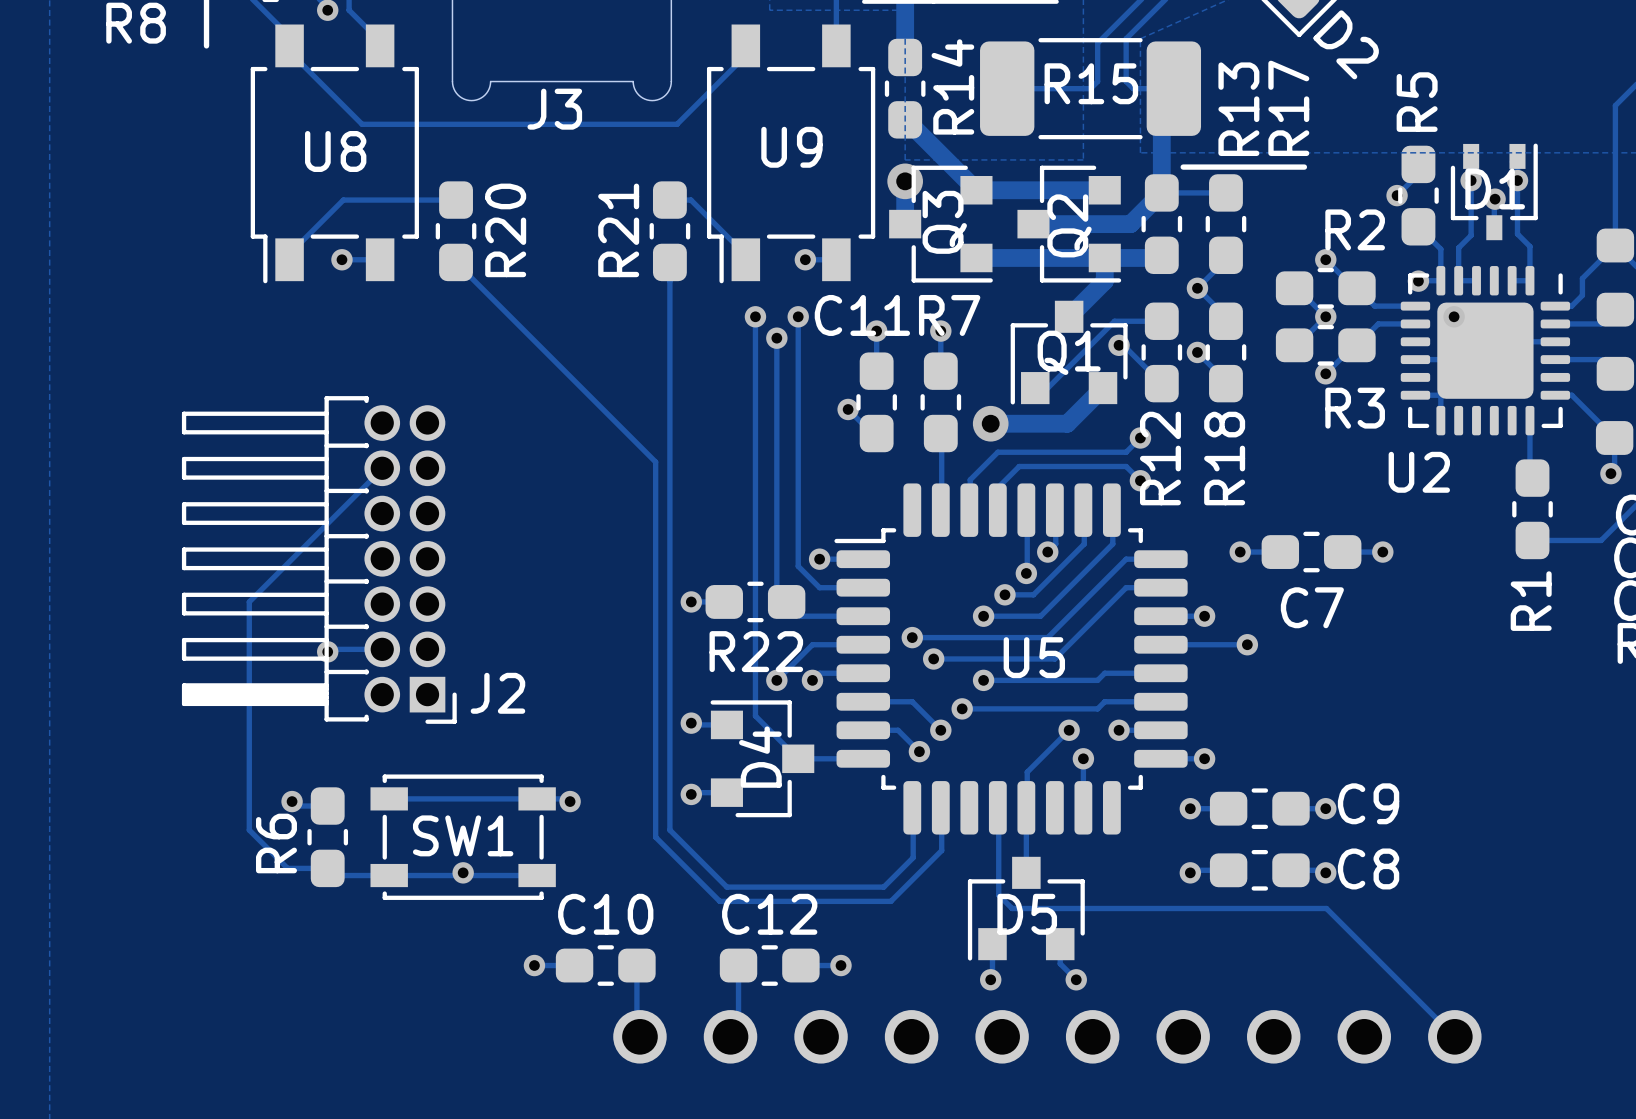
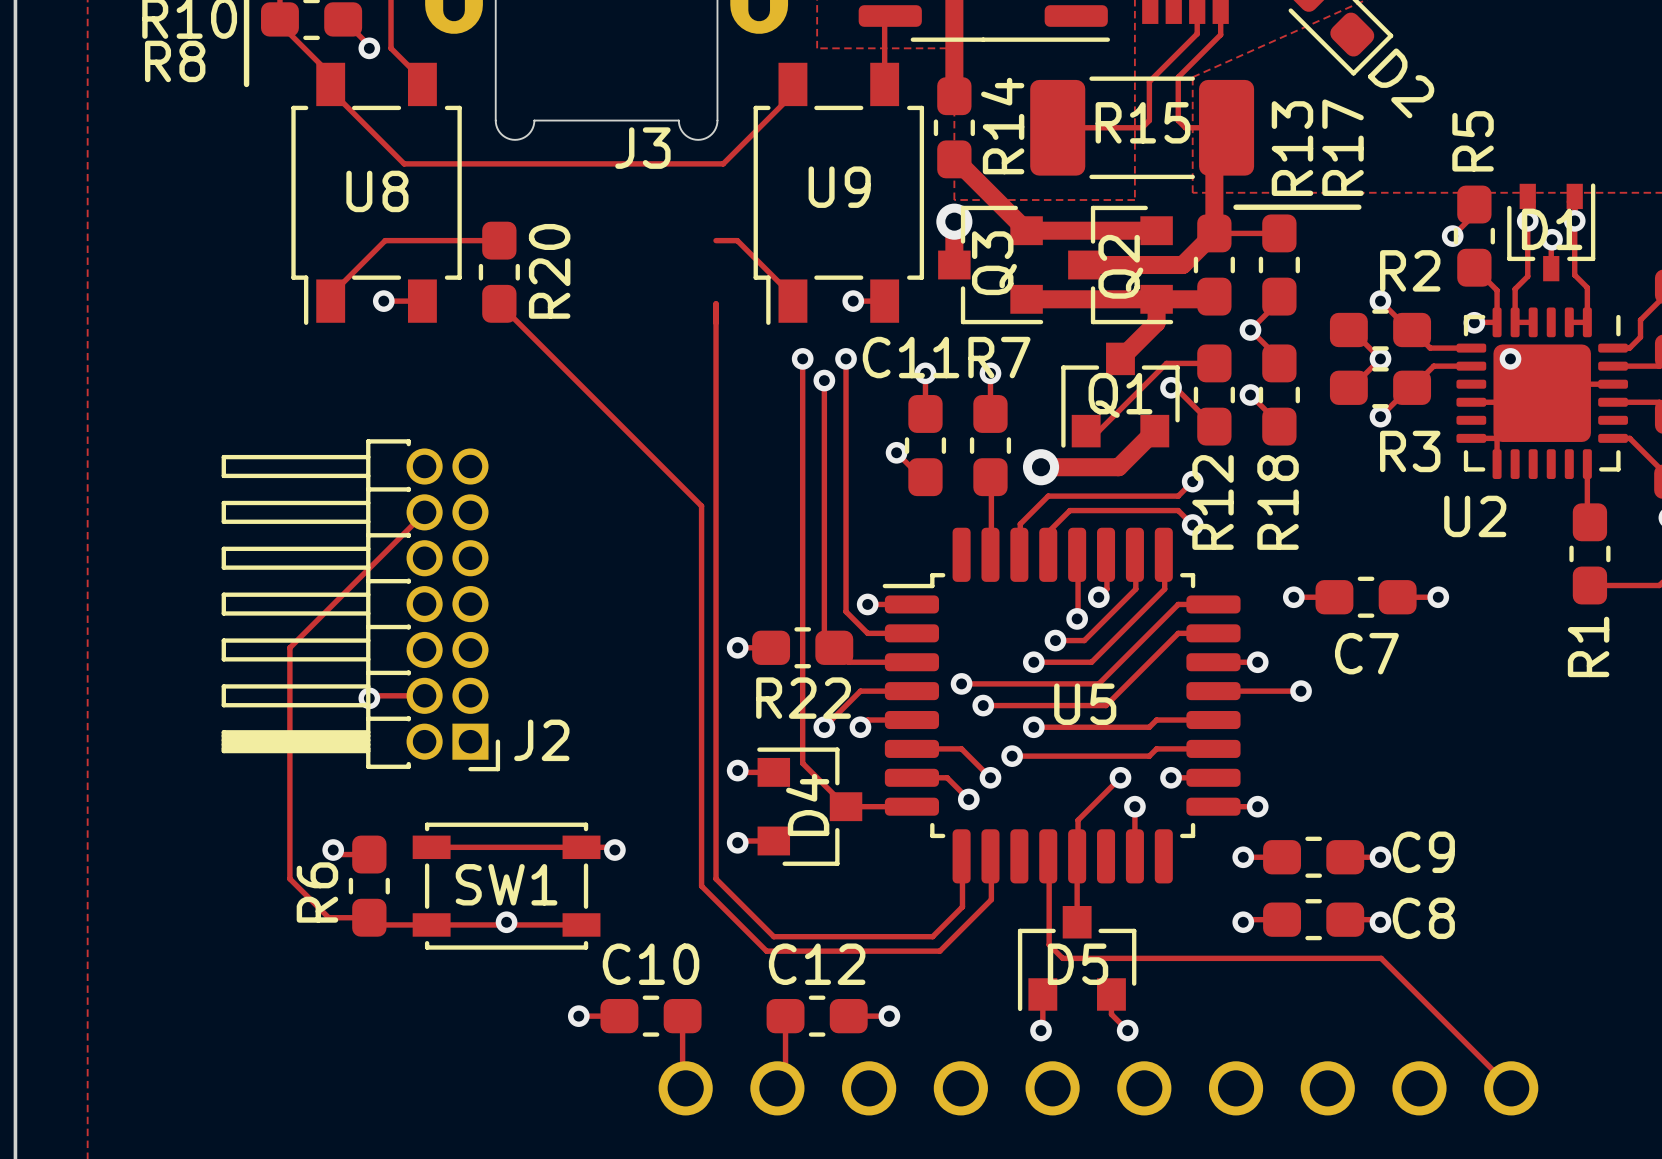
J3 name position: J3 (554, 109) -> J3 (642, 148)
R21: (669, 231) -> none

